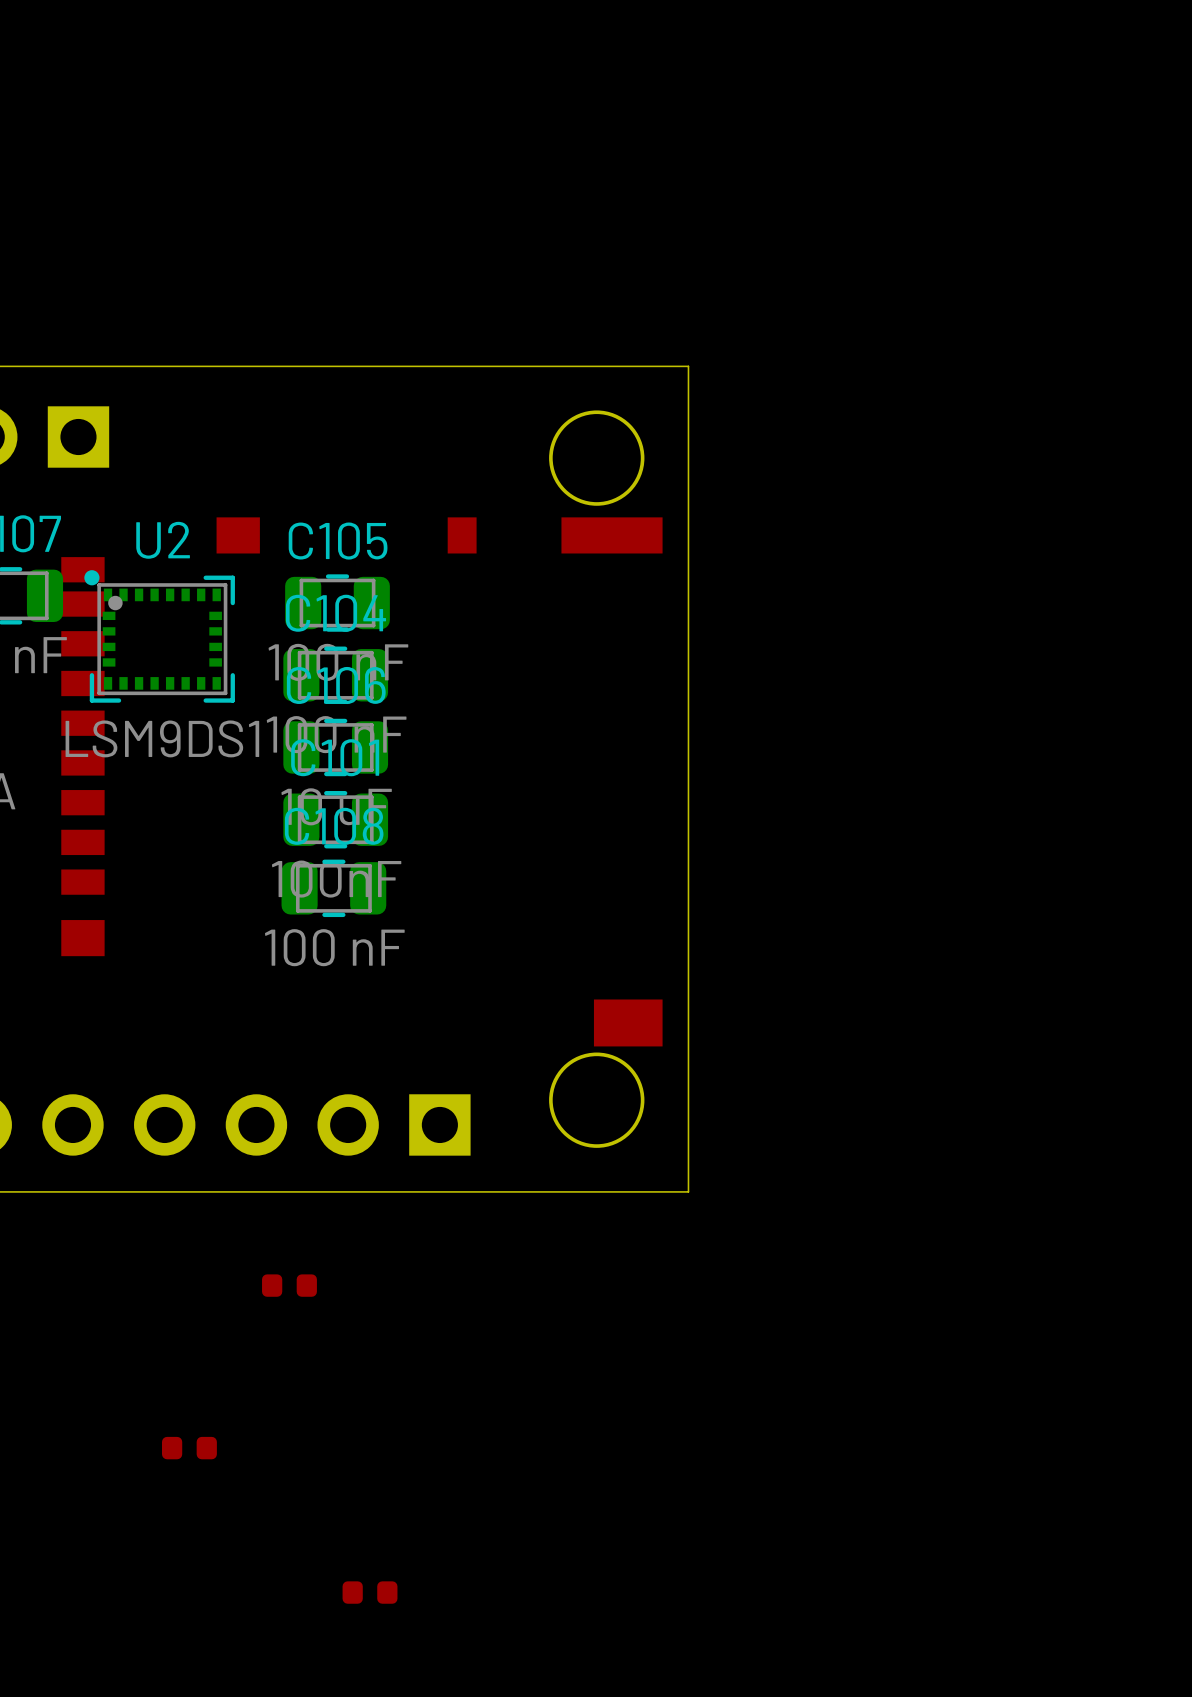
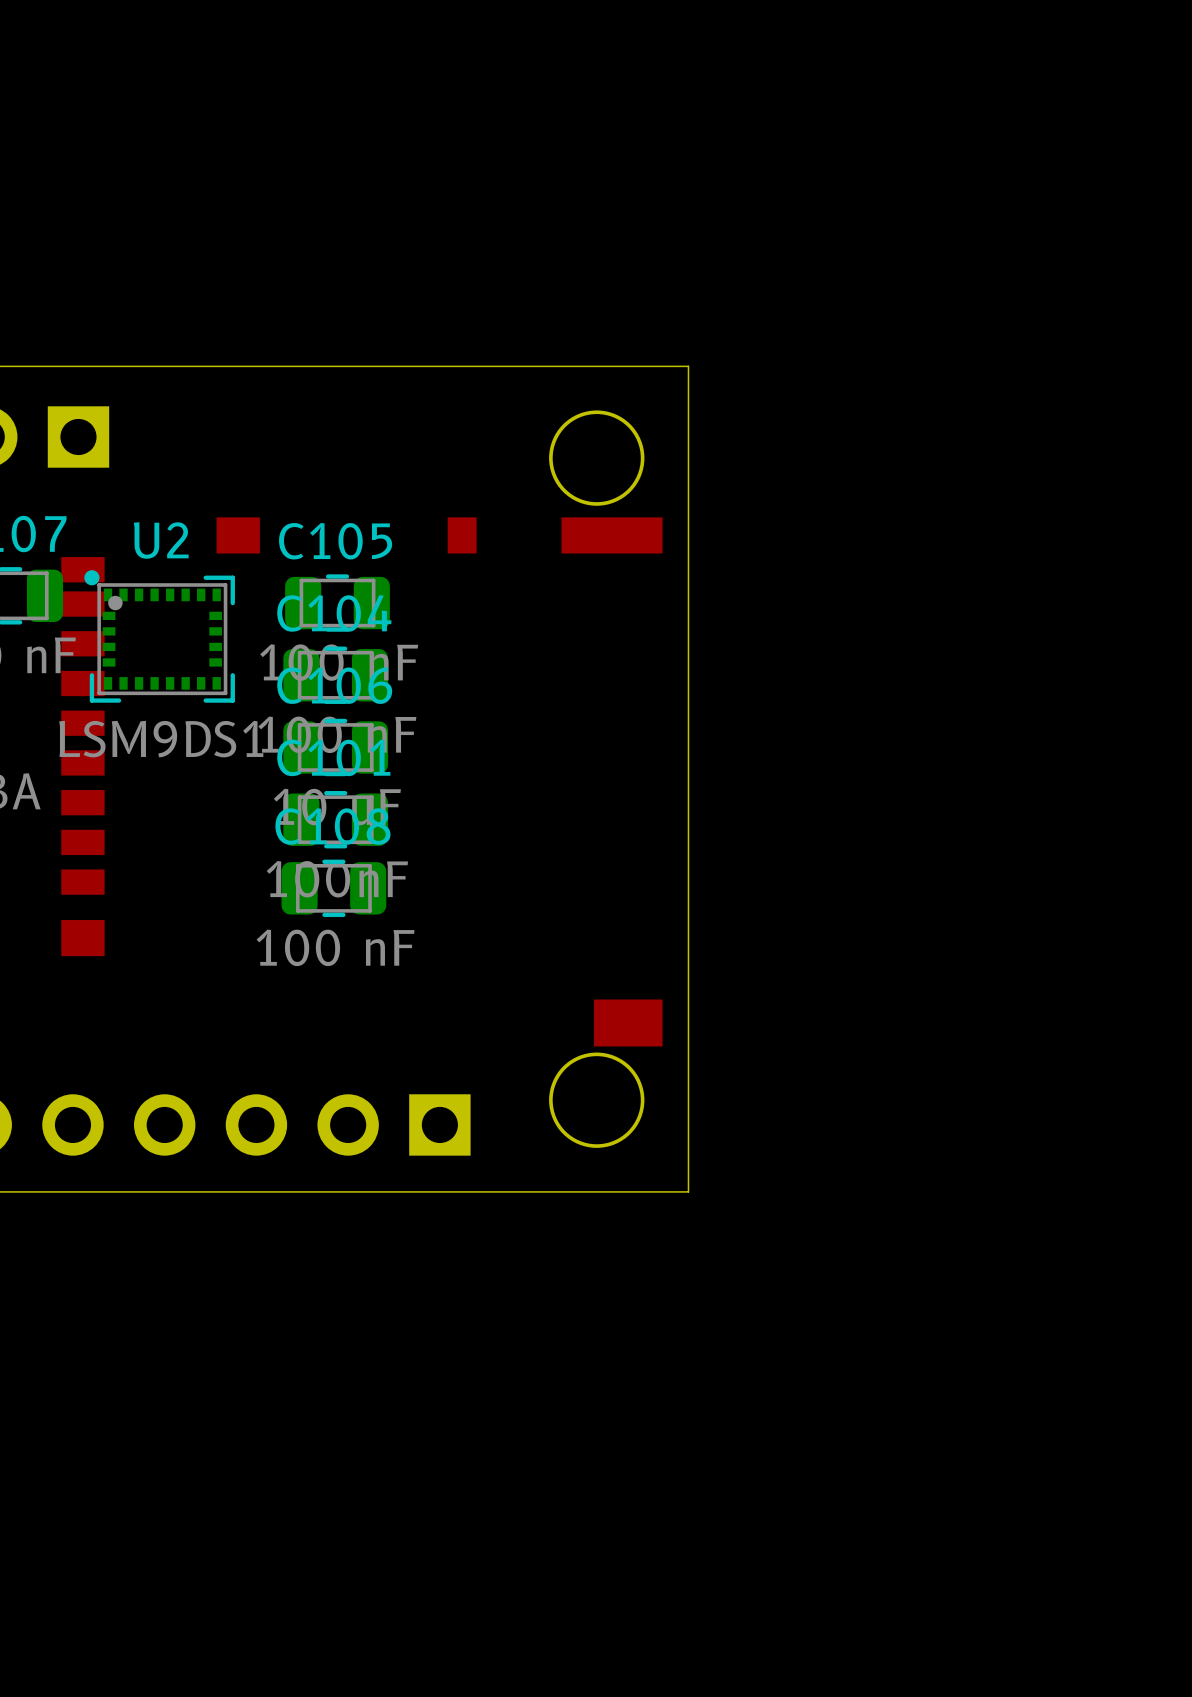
part: (289, 1285) -> none
part: (189, 1448) -> none
part: (370, 1592) -> none

